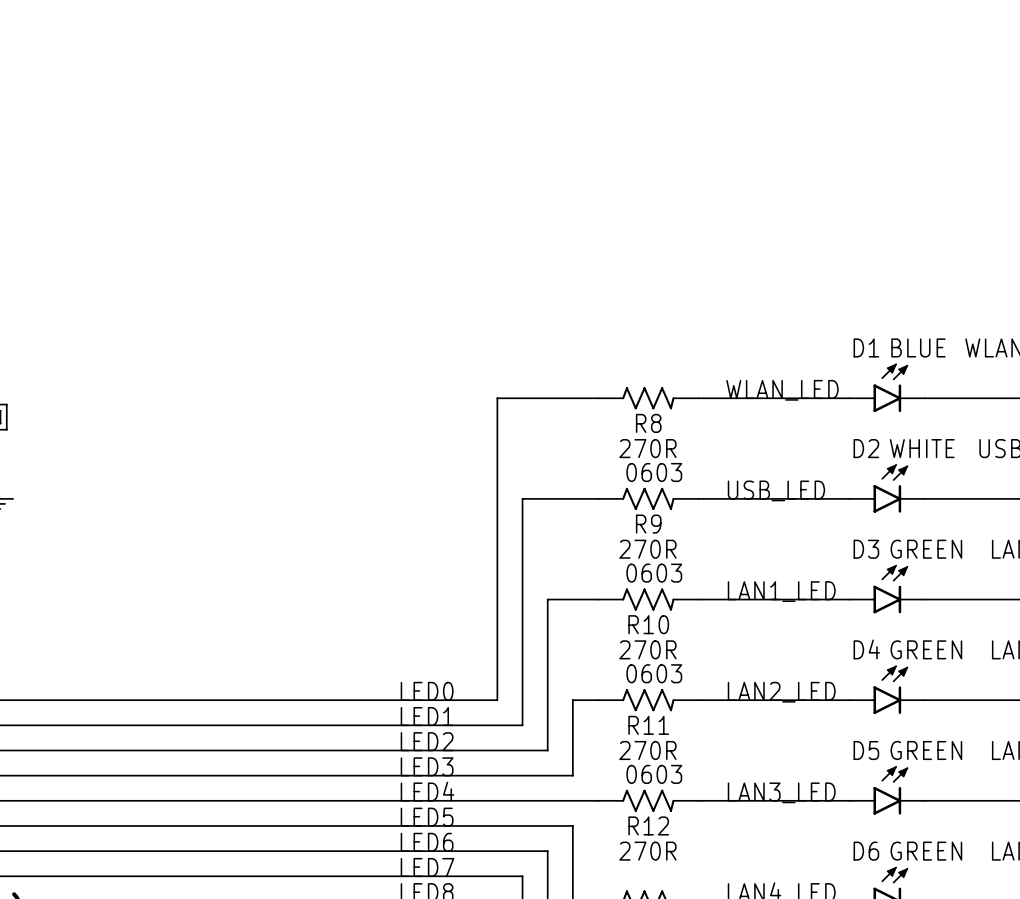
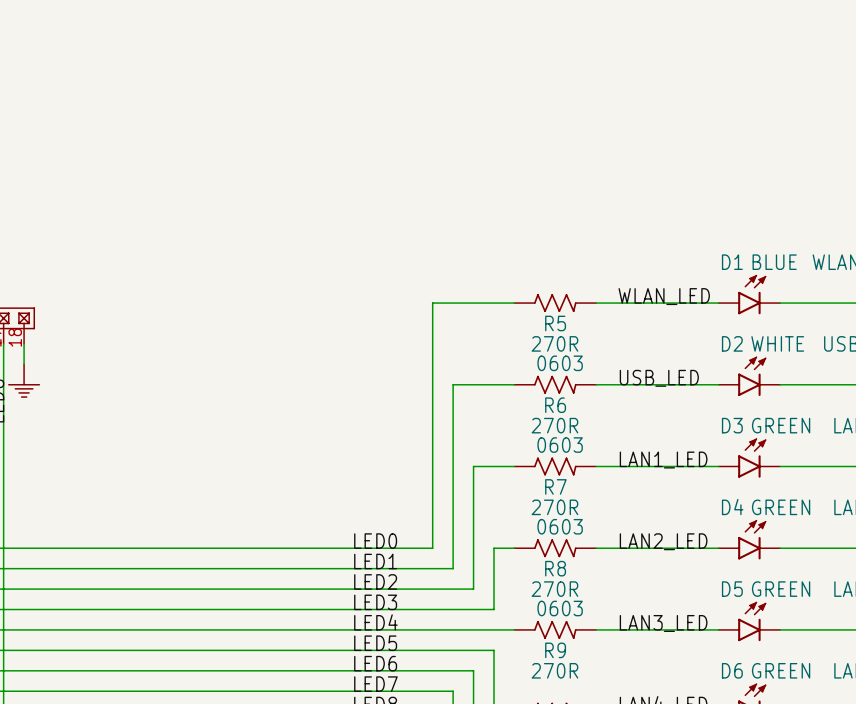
R8 name: R8 (648, 423) -> R5 (555, 323)
R9 name: R9 (648, 524) -> R6 (555, 405)
R10 name: R10 (648, 624) -> R7 (555, 486)
R11 name: R11 (648, 725) -> R8 (555, 568)
R12 name: R12 (648, 825) -> R9 (555, 650)

